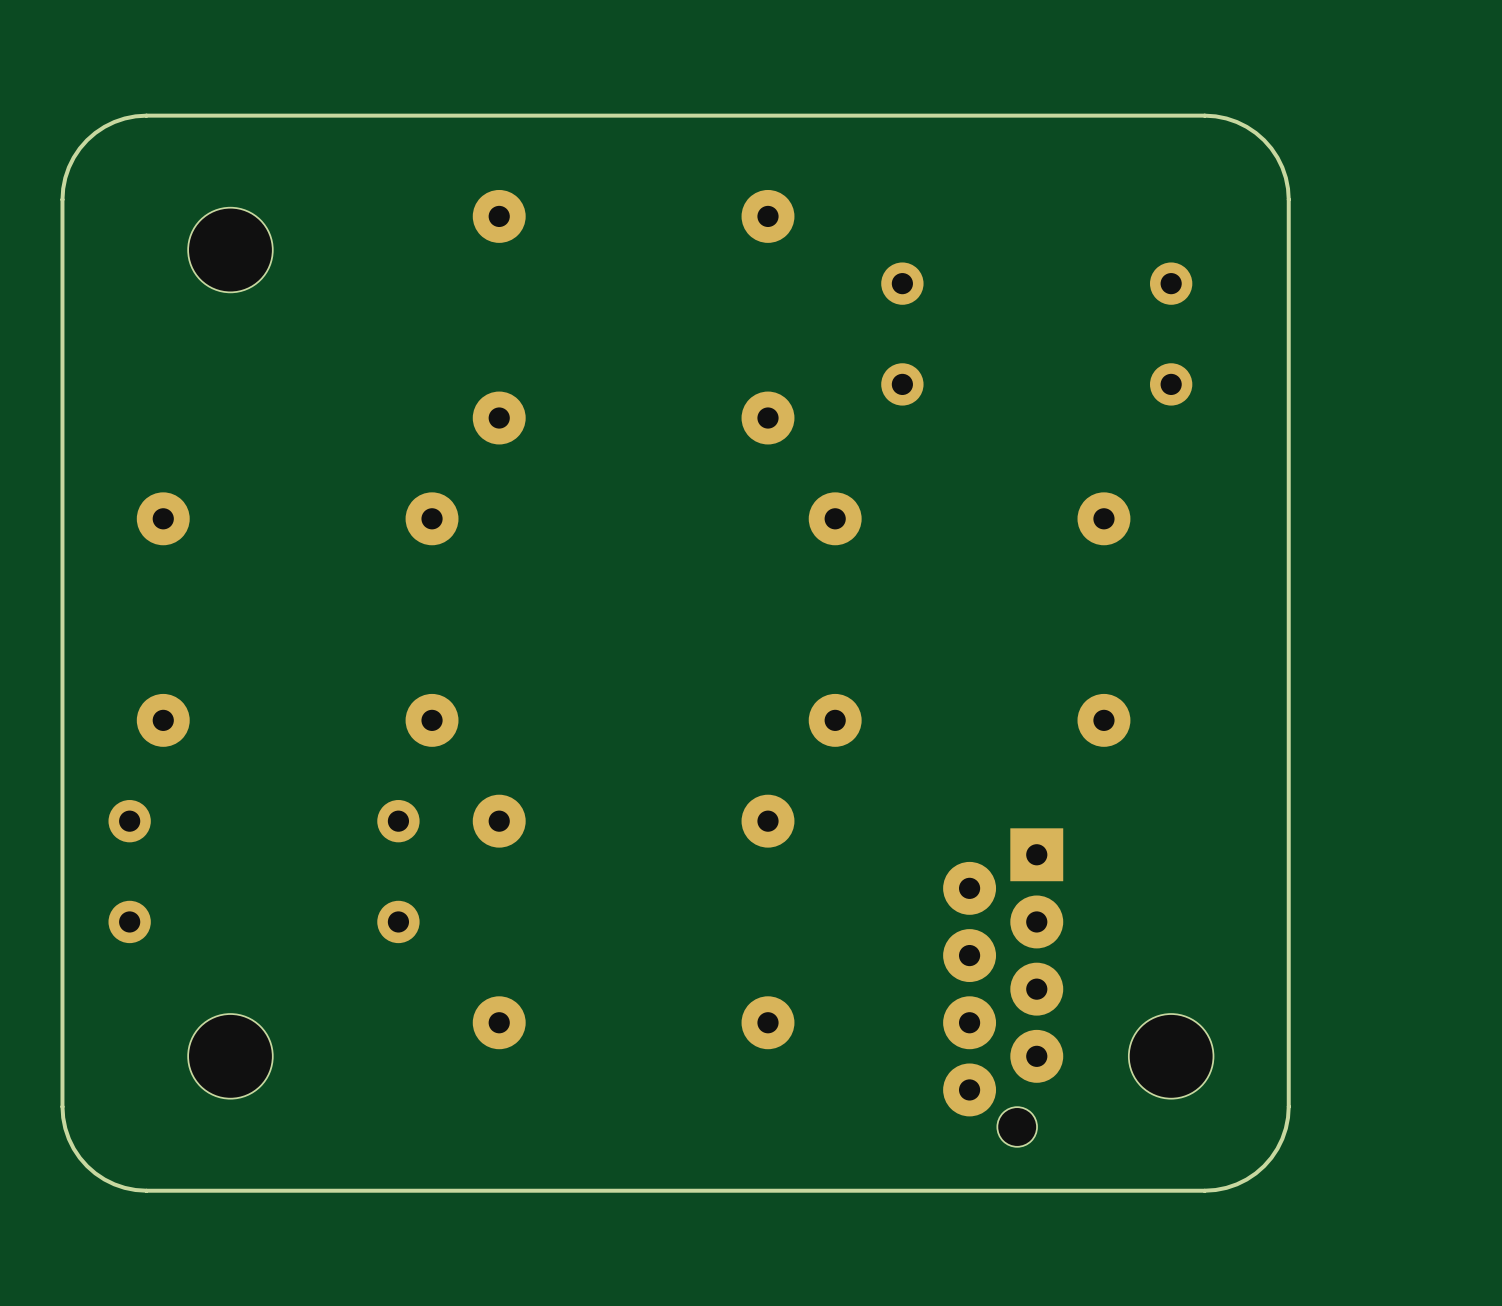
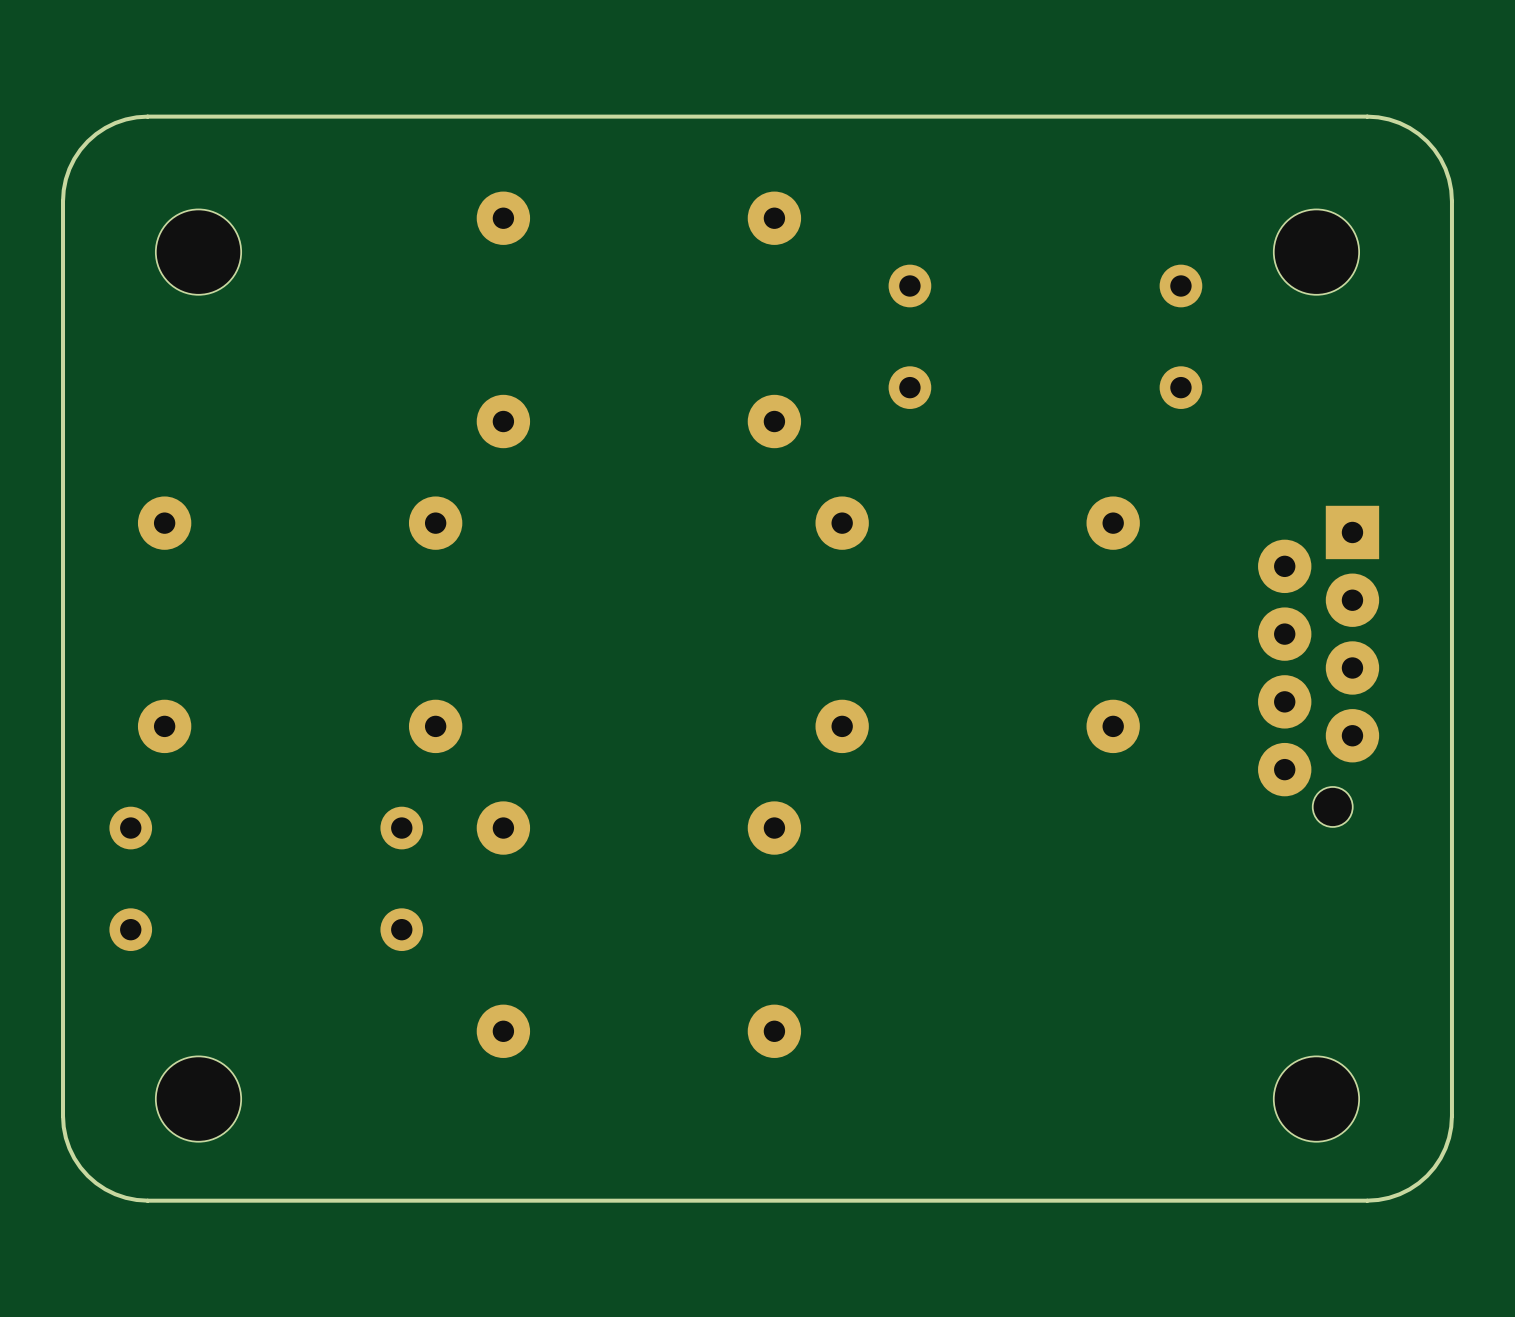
board edge: (1204, 115) (1236, 122) (1264, 140) (1282, 167) (1288, 199) -> none
board edge: (1288, 199) (1288, 1117) (1282, 1138) (1264, 1166) (1236, 1184) (1204, 1190) -> (1214, 116) (1367, 116) (1389, 119) (1409, 127) (1427, 141) (1440, 158) (1449, 179) (1451, 201) (1451, 1115) (1449, 1137) (1434, 1167) (1418, 1183) (1399, 1194) (1367, 1200) (1214, 1200)
part position: (230, 250) -> (198, 252)
part: none -> (1316, 252)
part position: (1003, 987) -> (1318, 666)
part position: (230, 1056) -> (198, 1099)
part position: (1171, 1056) -> (1316, 1099)

